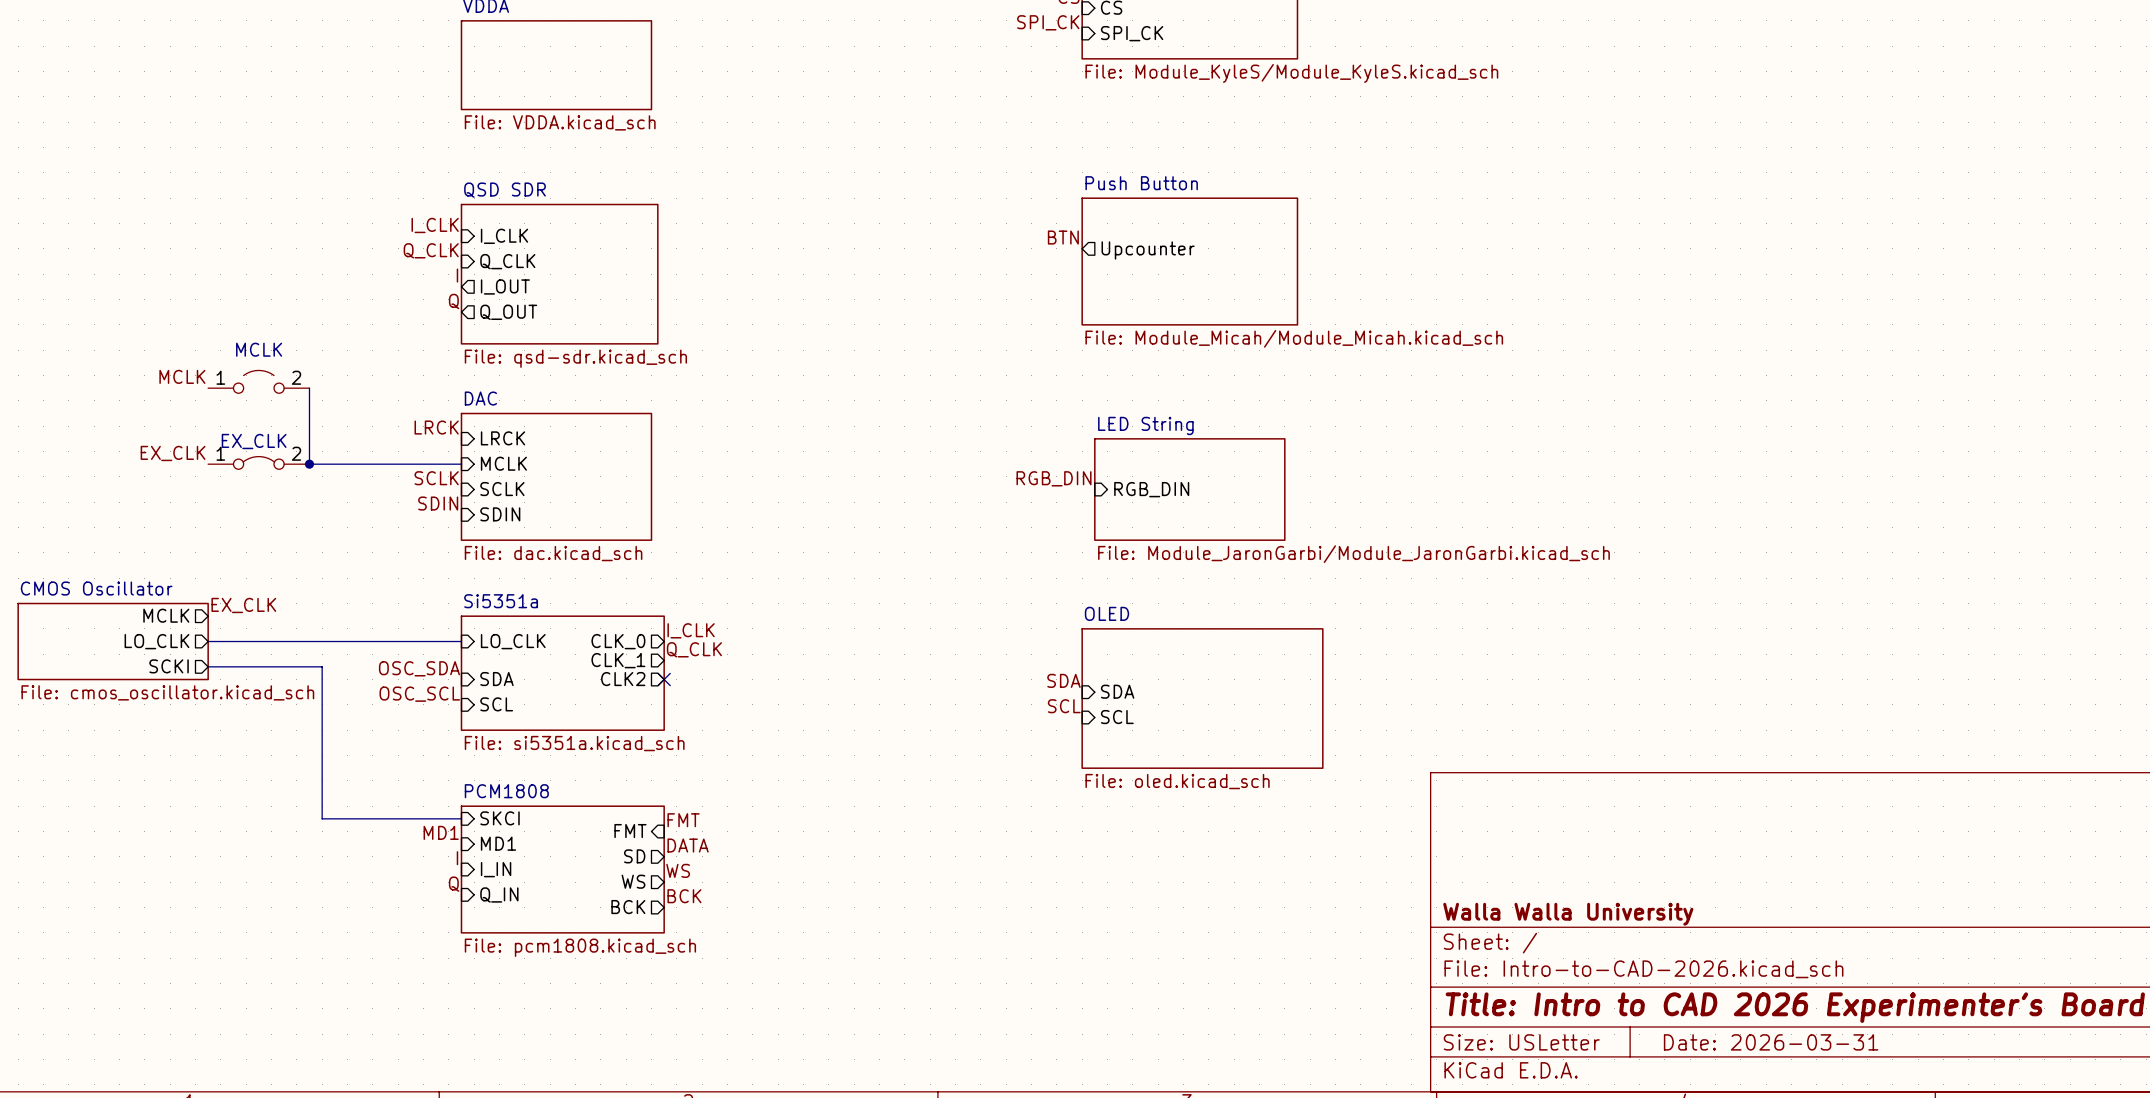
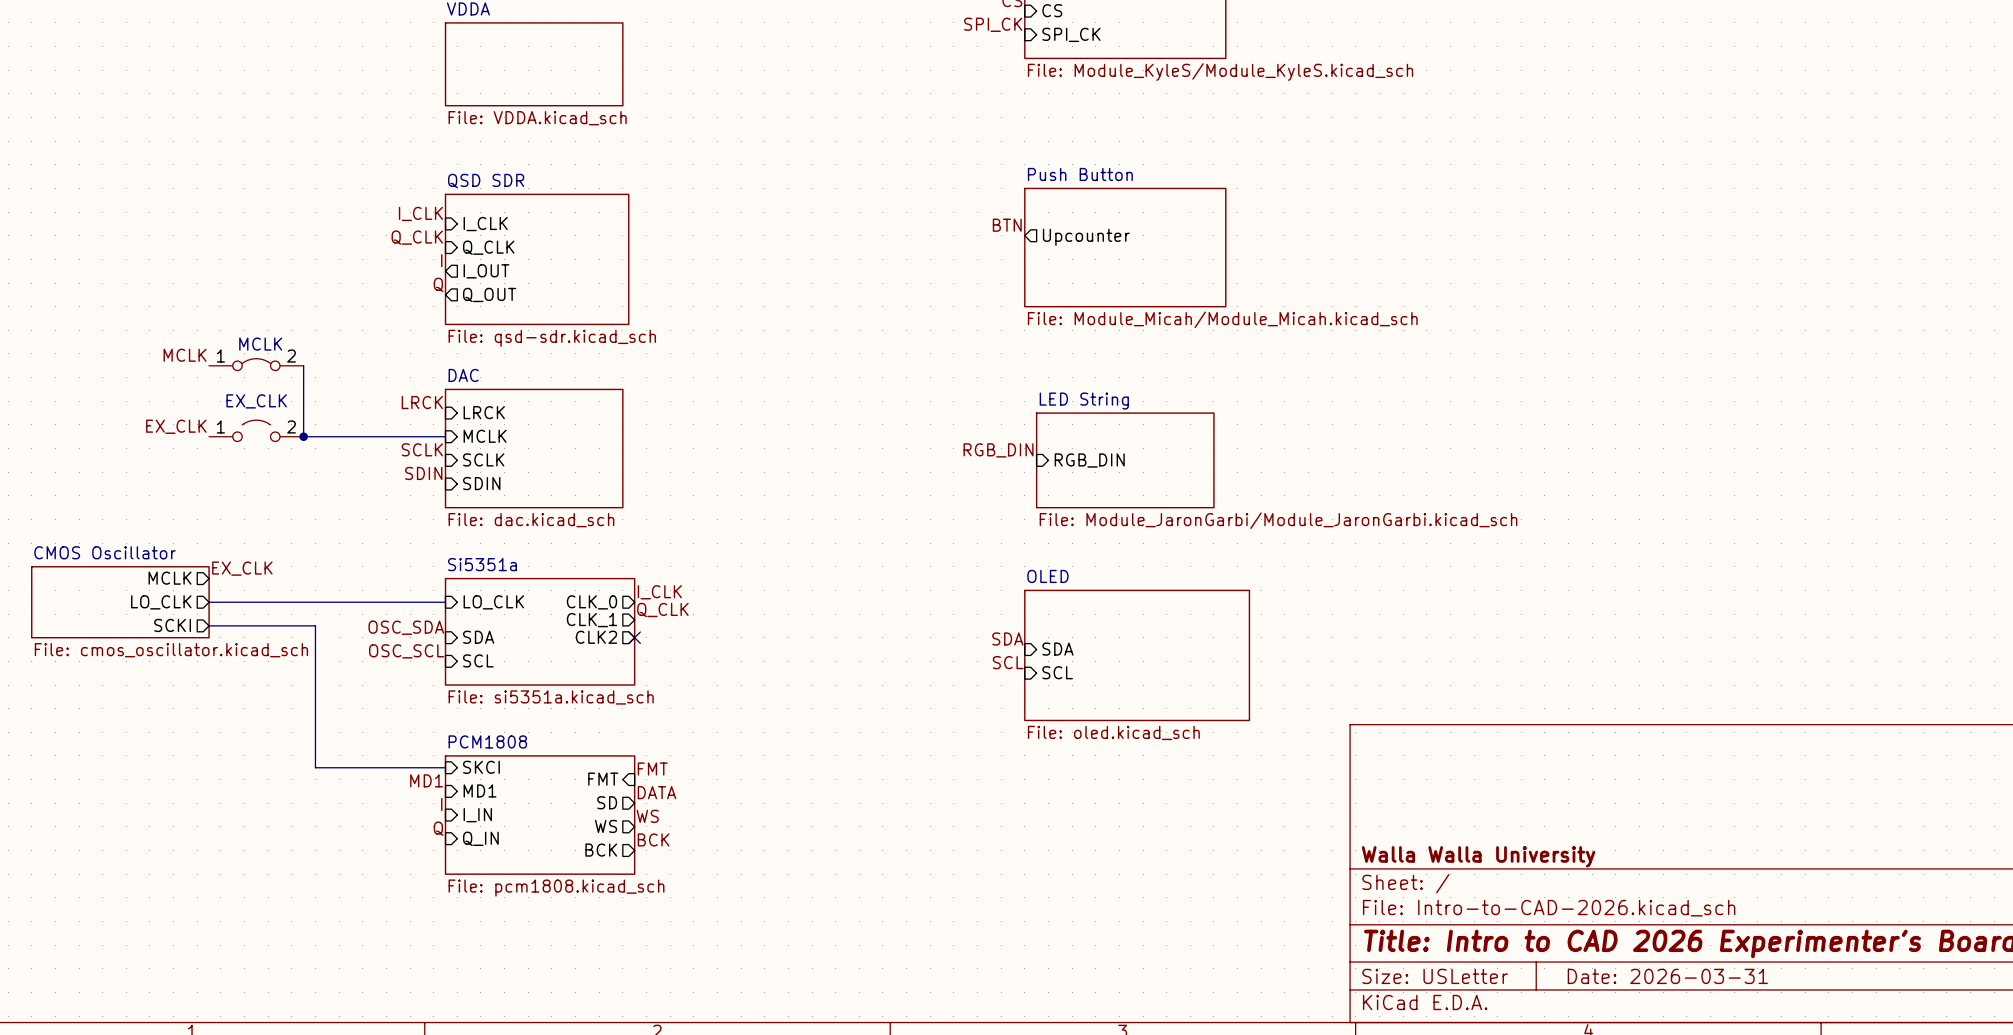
part symbol: [208, 370, 310, 394] -> [209, 358, 304, 371]
part symbol: [208, 456, 310, 470] -> [209, 420, 304, 442]

